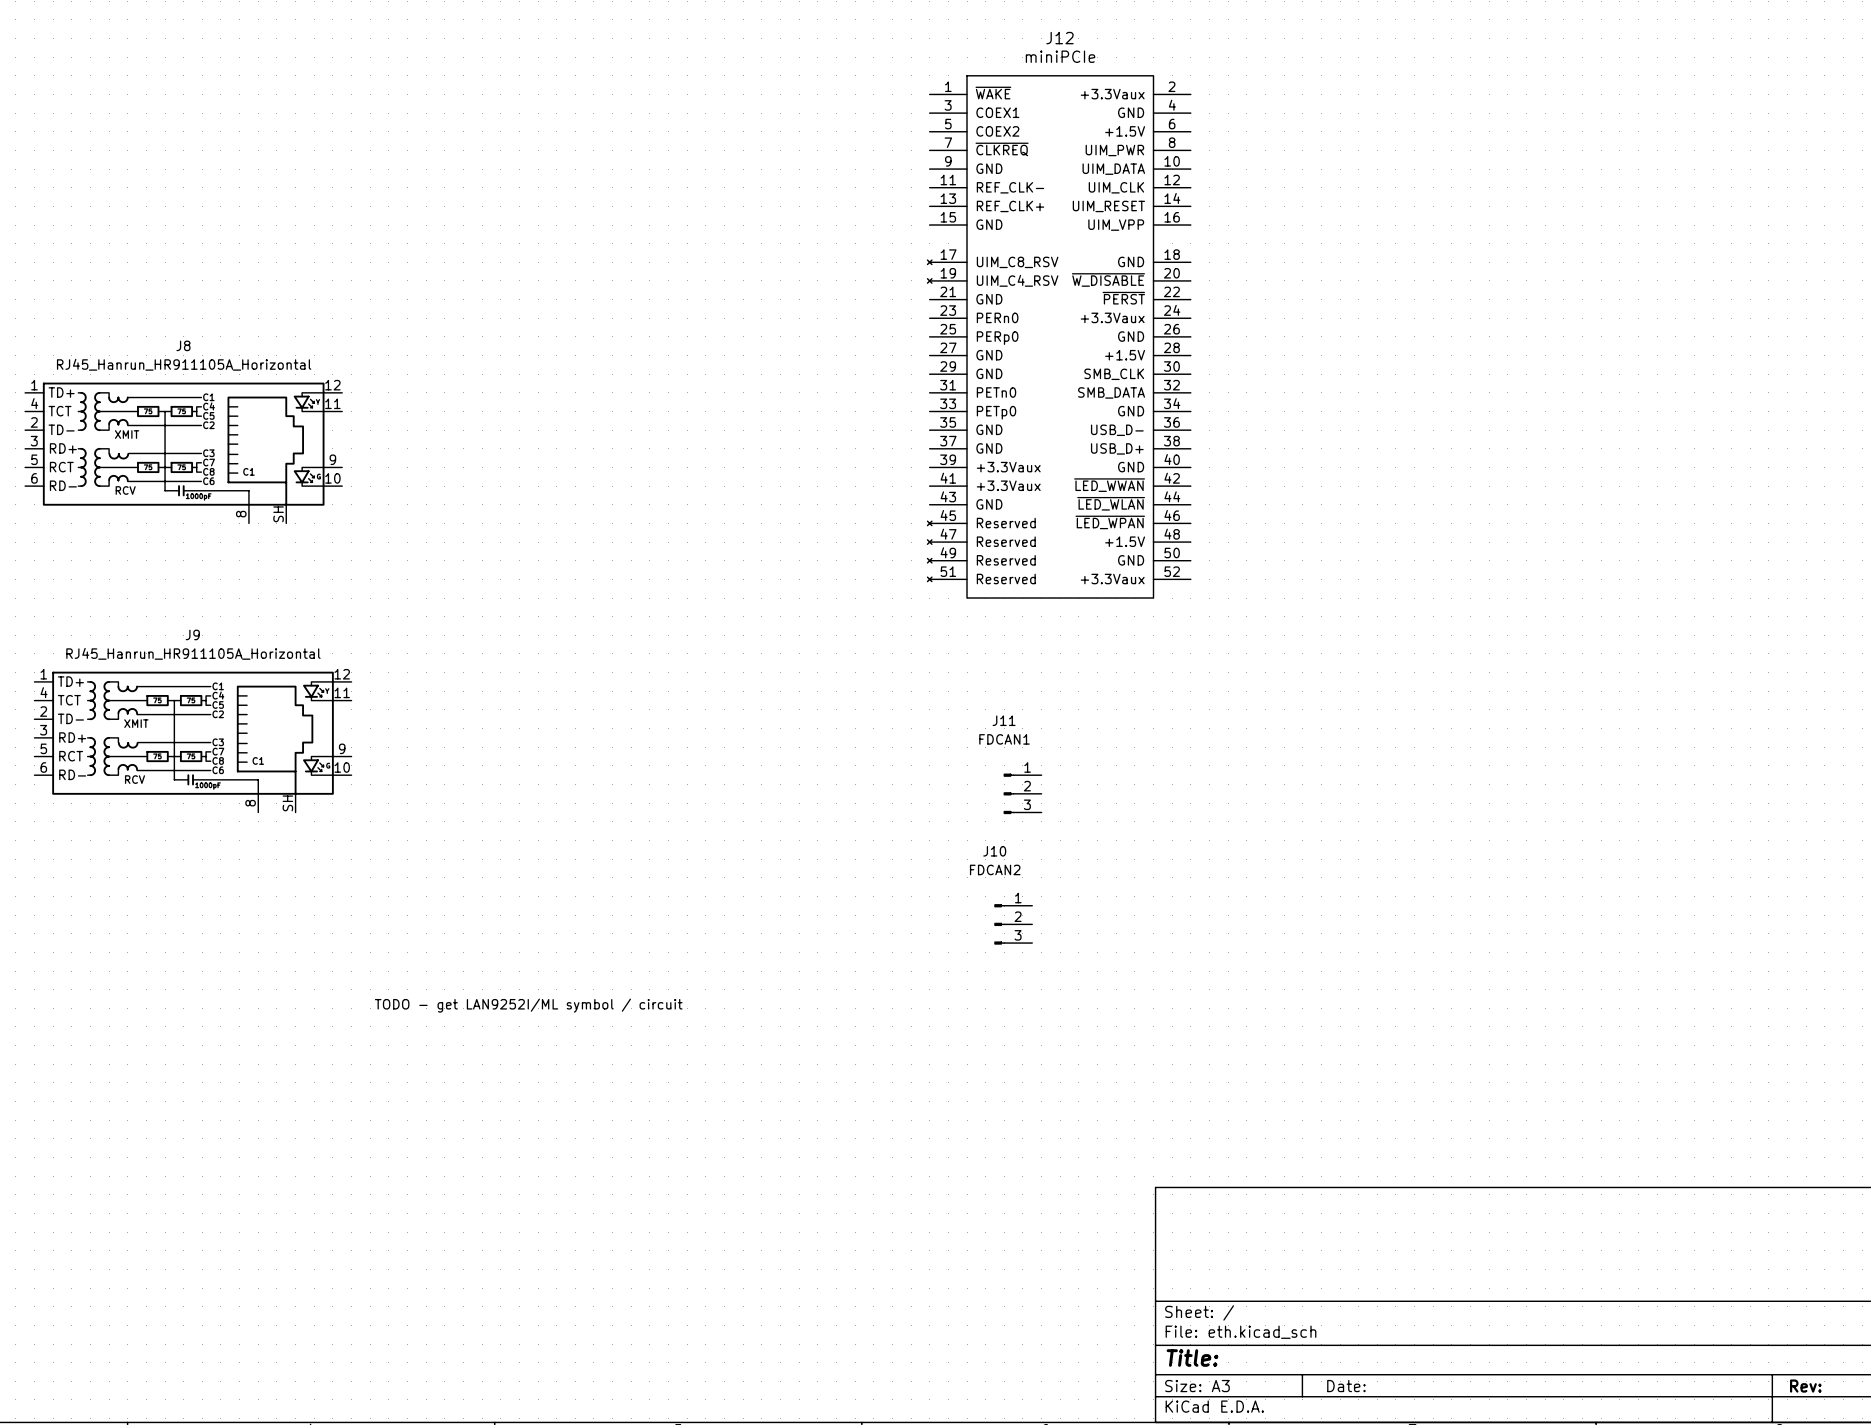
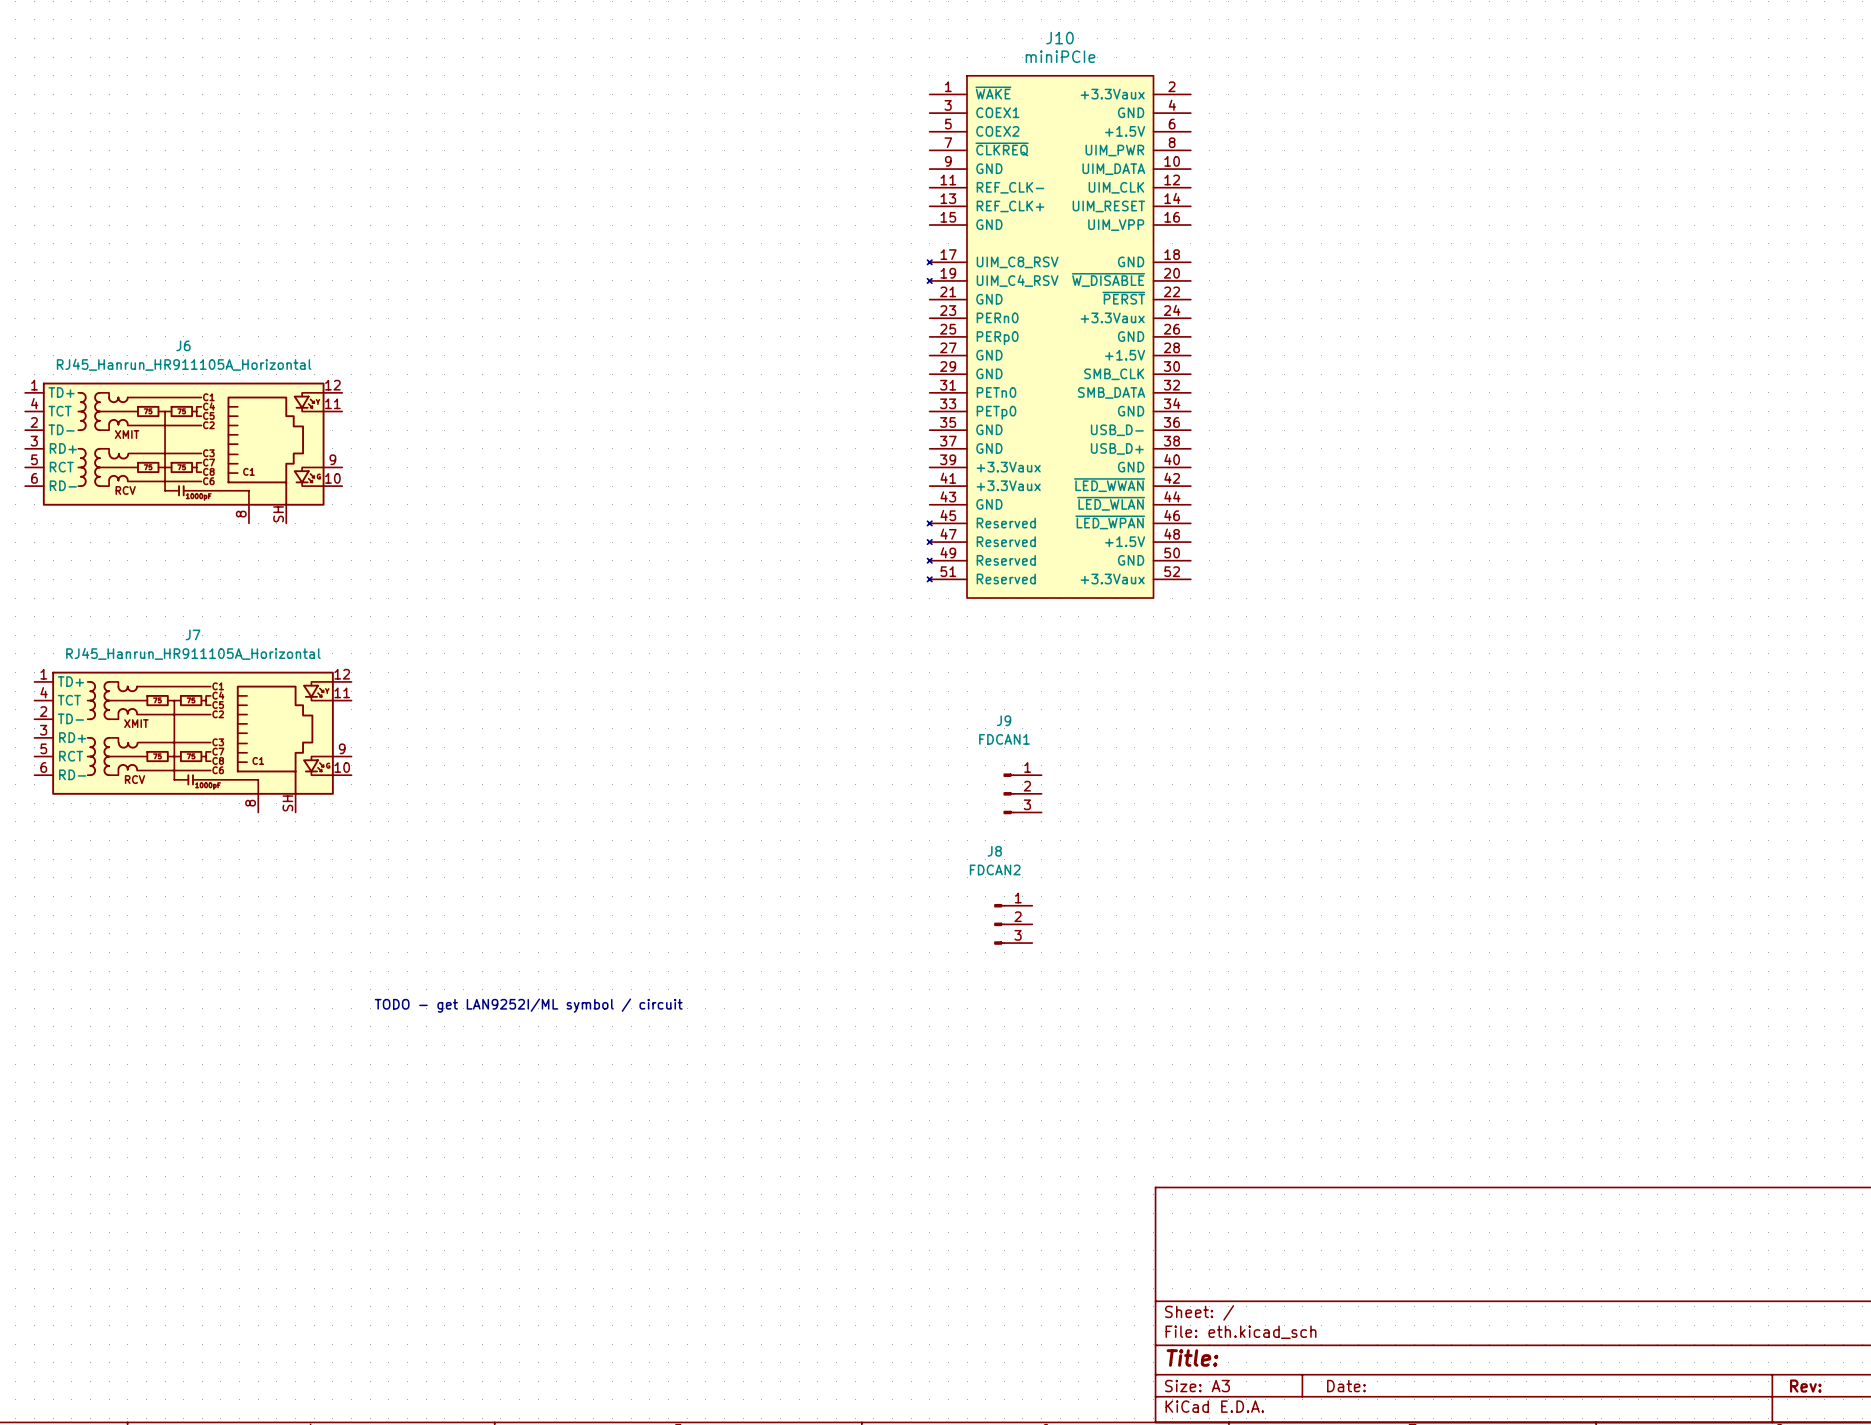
J12 name: J12 (1059, 38) -> J10 (1059, 38)
J8 name: J8 (183, 345) -> J6 (183, 345)
J9 name: J9 (192, 634) -> J7 (193, 634)
J11 name: J11 (1004, 720) -> J9 (1004, 720)
J10 name: J10 (994, 851) -> J8 (994, 851)

